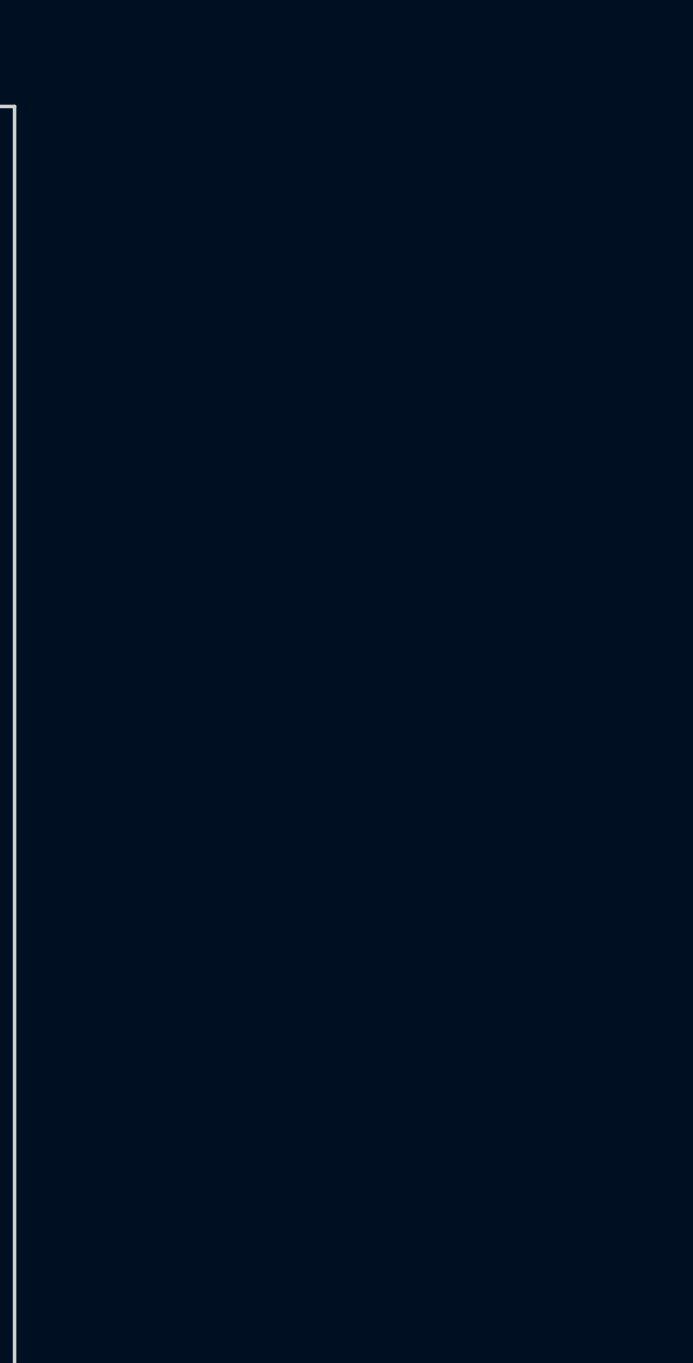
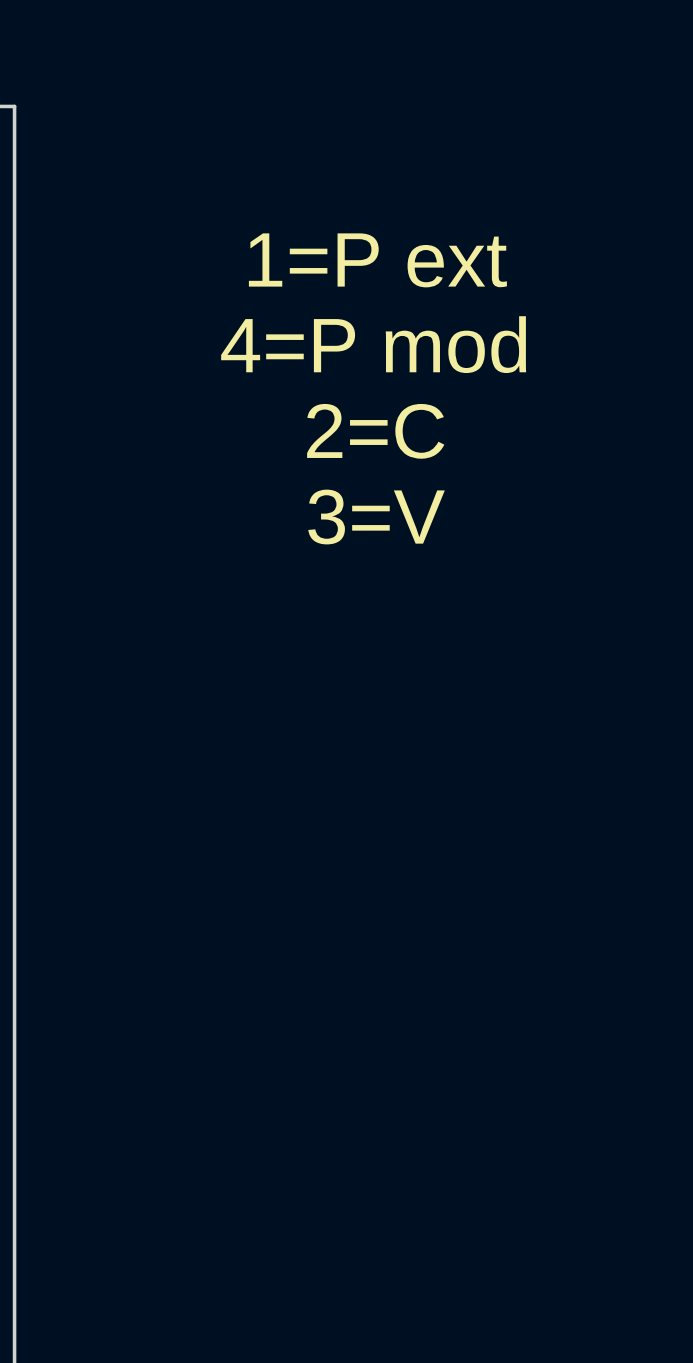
text: none -> 1=P ext (377, 260)
text: none -> 4=P mod (373, 344)
text: none -> 2=C (375, 431)
text: none -> 3=V (376, 517)

